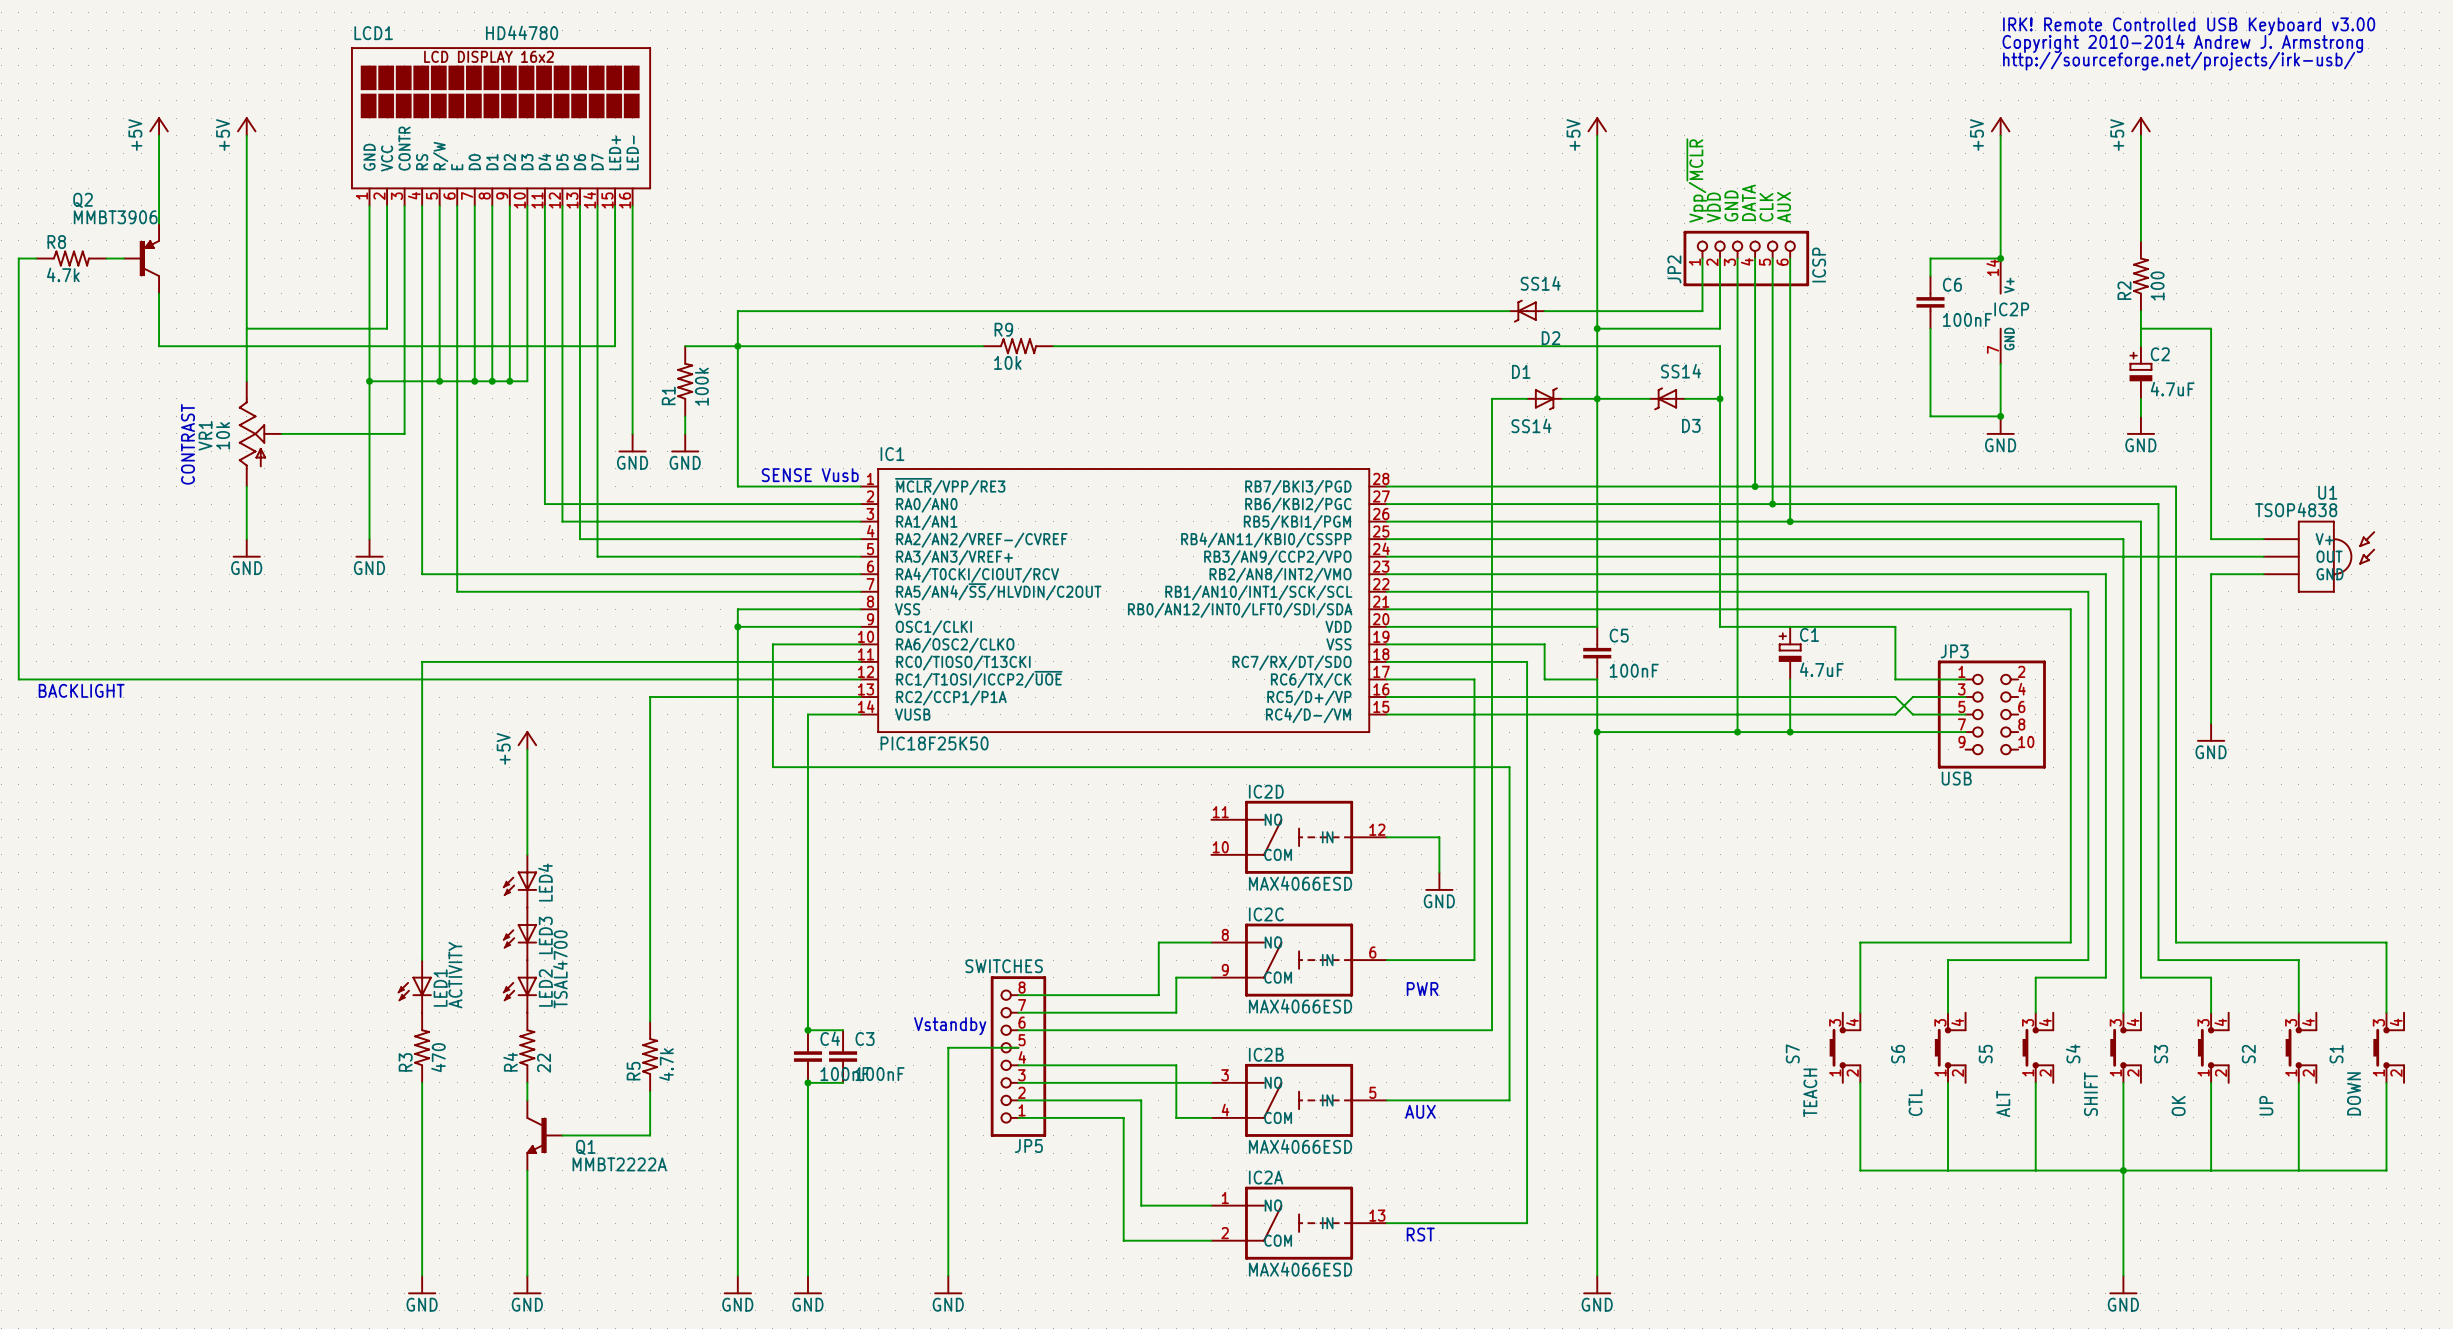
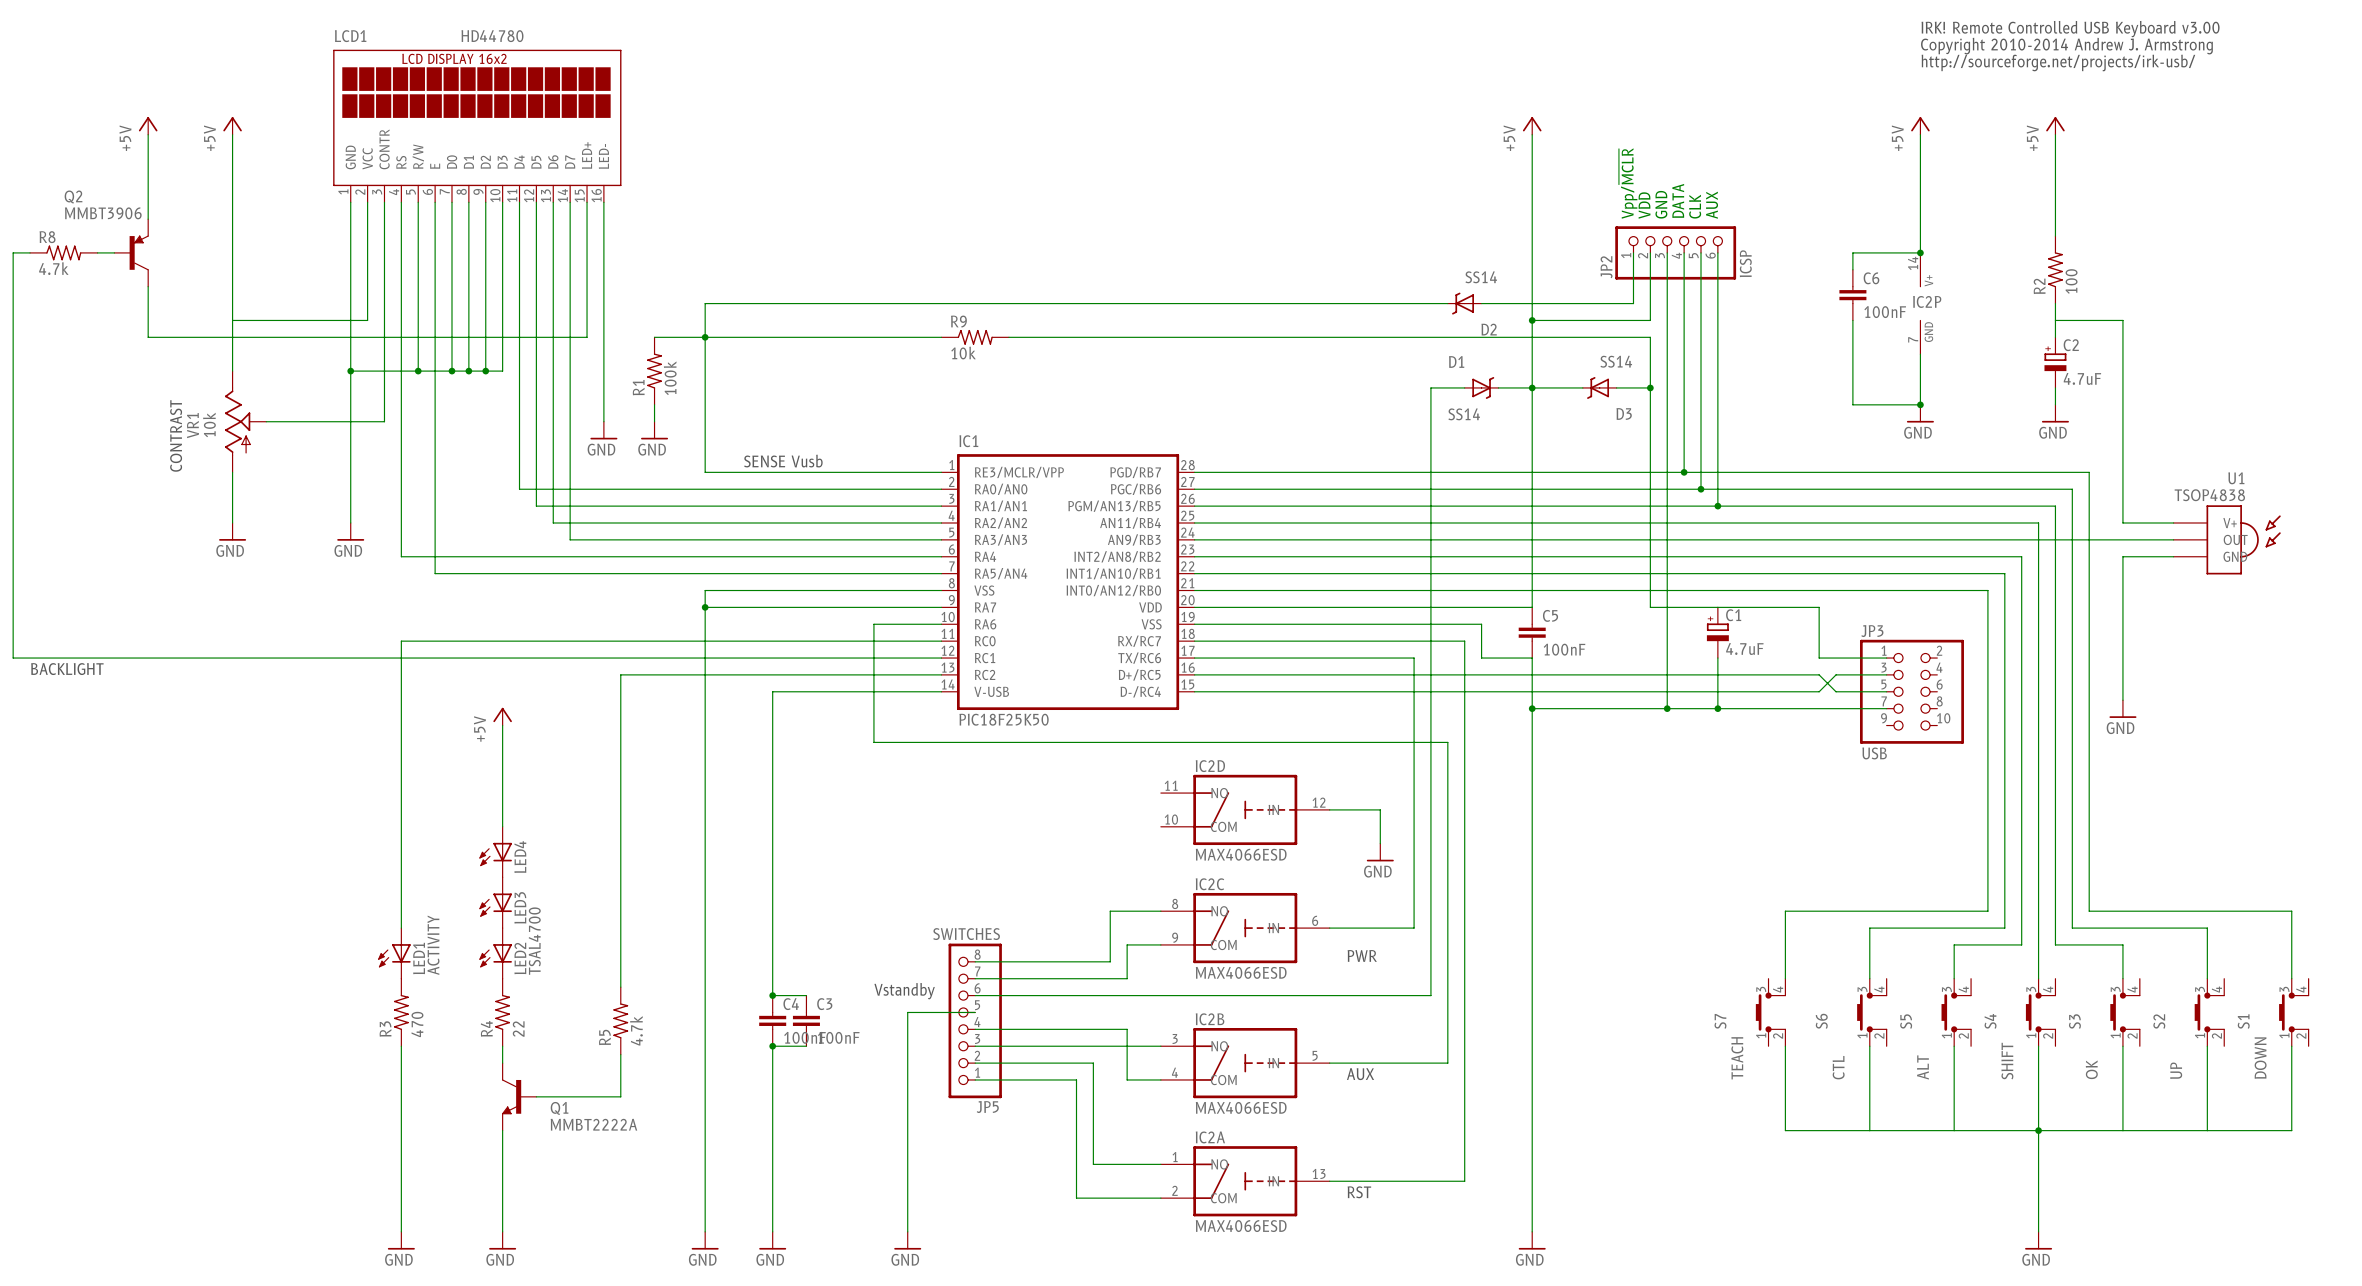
IC1 name position: IC1 (892, 454) -> IC1 (968, 441)
IC1 symbol: [860, 468, 1387, 733] -> [941, 454, 1195, 711]
wire: none -> (823, 472) (941, 472)
wire: none -> (1194, 472) (1329, 472)
wire: none -> (823, 489) (941, 489)
wire: none -> (1194, 489) (1329, 489)
wire: none -> (823, 506) (941, 506)
wire: none -> (1194, 506) (1329, 506)
wire: none -> (823, 522) (941, 522)
wire: none -> (1194, 522) (1329, 522)
wire: none -> (823, 539) (941, 539)
wire: none -> (1194, 539) (1329, 539)
wire: none -> (823, 556) (941, 556)
wire: none -> (1194, 556) (1329, 556)
wire: none -> (823, 573) (941, 573)
wire: none -> (1194, 573) (1329, 573)
wire: none -> (823, 590) (941, 590)
wire: none -> (1194, 590) (1329, 590)
wire: none -> (823, 607) (941, 607)
wire: none -> (1194, 607) (1329, 607)
wire: (860, 644) (772, 644) (772, 767) (913, 767) -> (941, 624) (873, 624) (873, 742)
wire: none -> (1194, 624) (1329, 624)
wire: none -> (823, 641) (941, 641)
wire: none -> (1194, 641) (1329, 641)
wire: none -> (823, 658) (941, 658)
wire: none -> (1194, 658) (1329, 658)
wire: none -> (823, 674) (941, 674)
wire: none -> (1194, 674) (1329, 674)
wire: none -> (823, 691) (941, 691)
wire: none -> (1194, 691) (1329, 691)
IC1 value position: PIC18F25K50 (934, 743) -> PIC18F25K50 (1004, 719)

